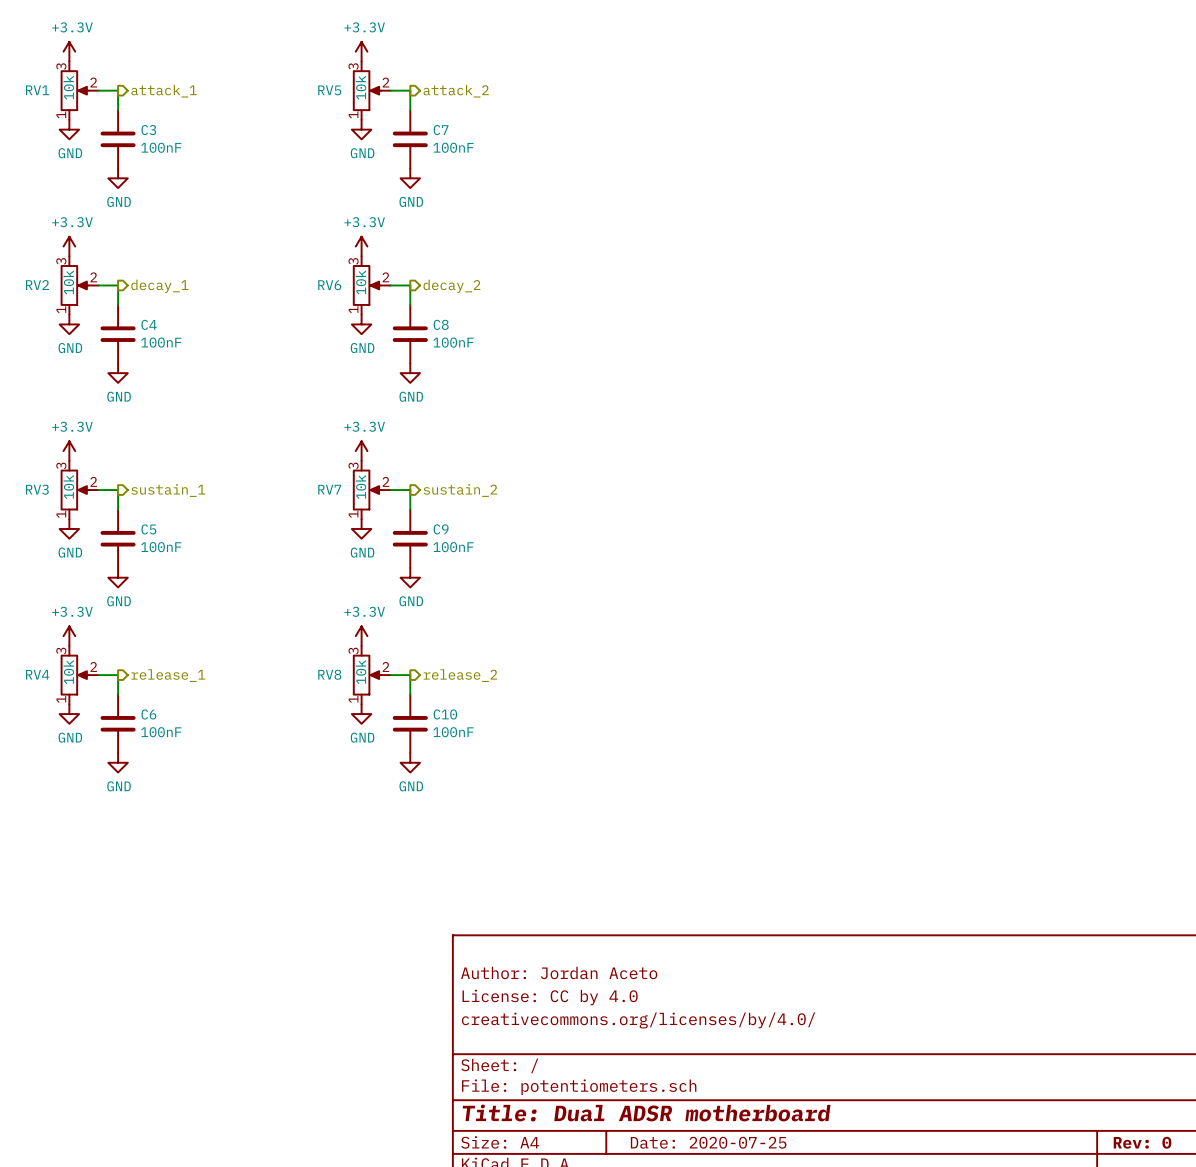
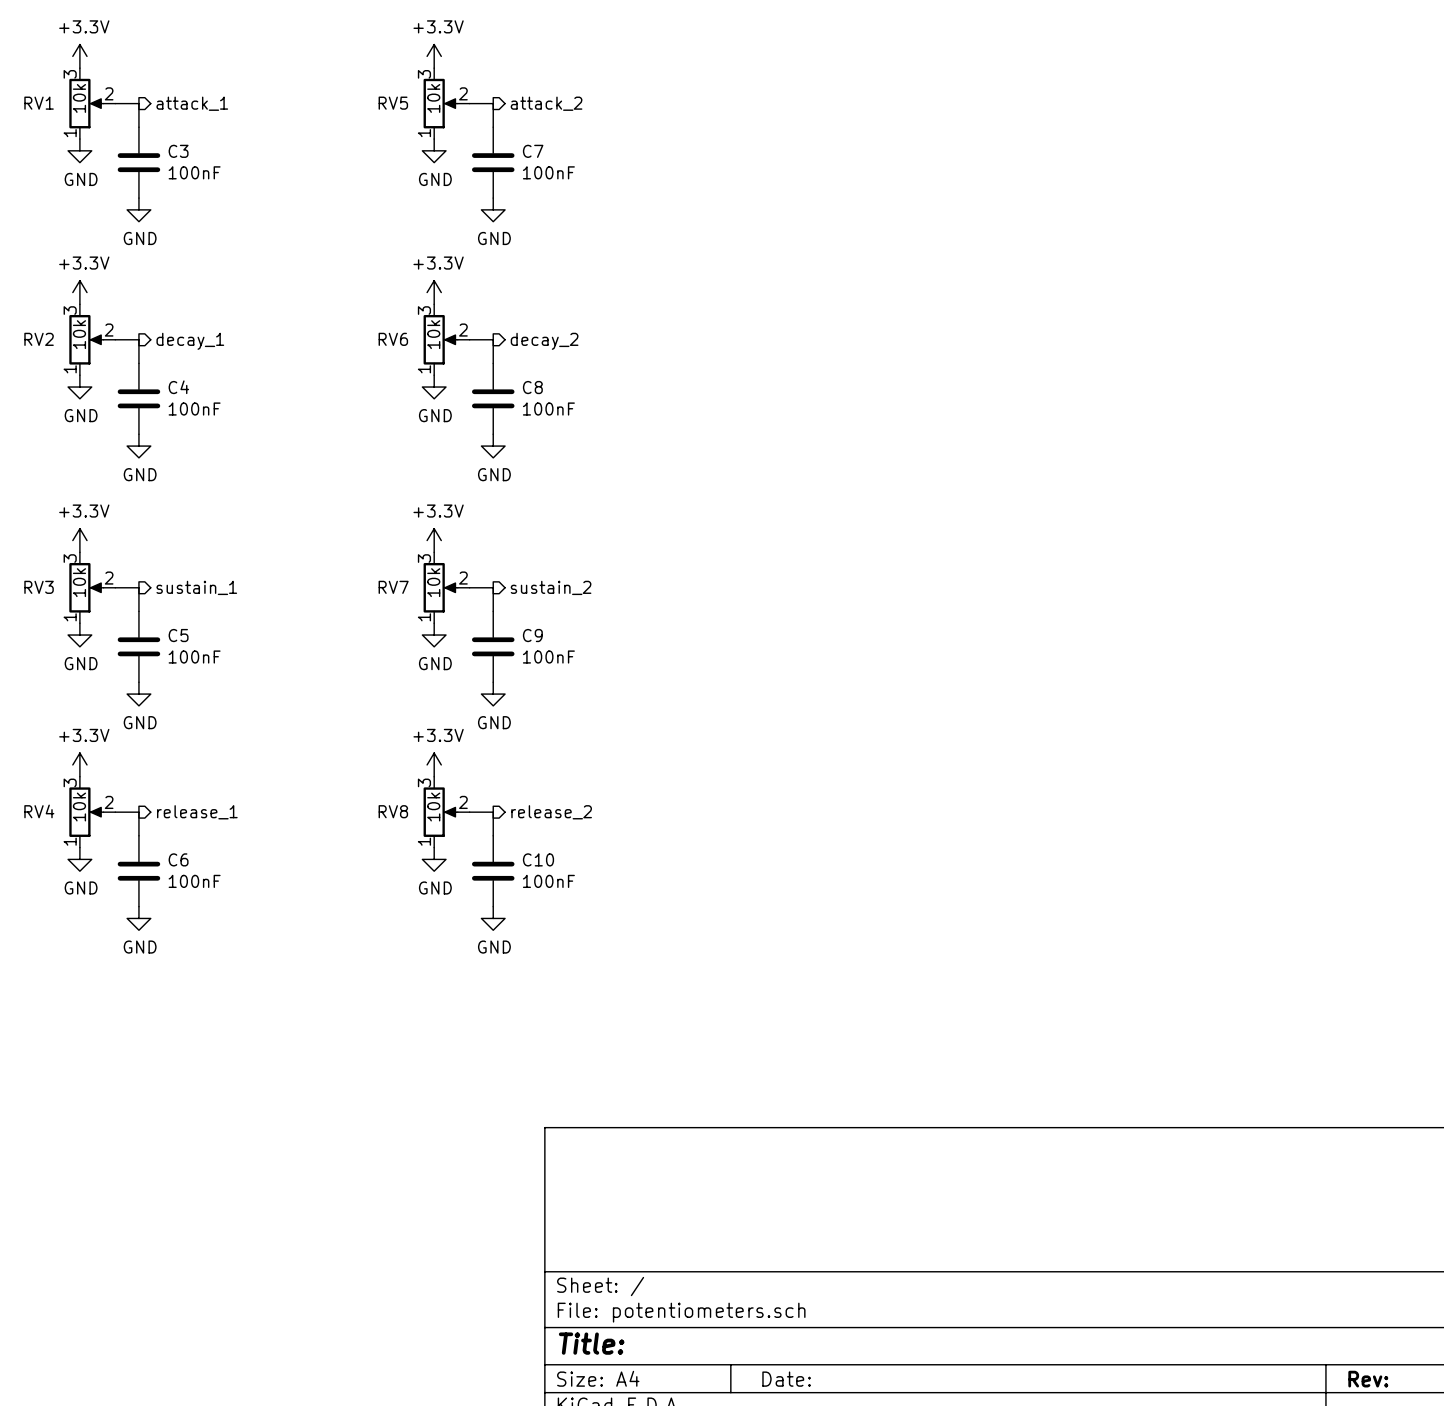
title block: Author: Jordan Aceto (559, 972) -> none
title block: License: CC by 4.0 (550, 997) -> none
title block: creativecommons.org/licenses/by/4.0/ (638, 1020) -> none
title block: Title: Dual ADSR motherboard (646, 1112) -> Title: (591, 1343)
title block: Date: 2020-07-25 (708, 1142) -> Date: (786, 1379)
title block: Rev: 0 (1142, 1142) -> Rev: (1368, 1379)

